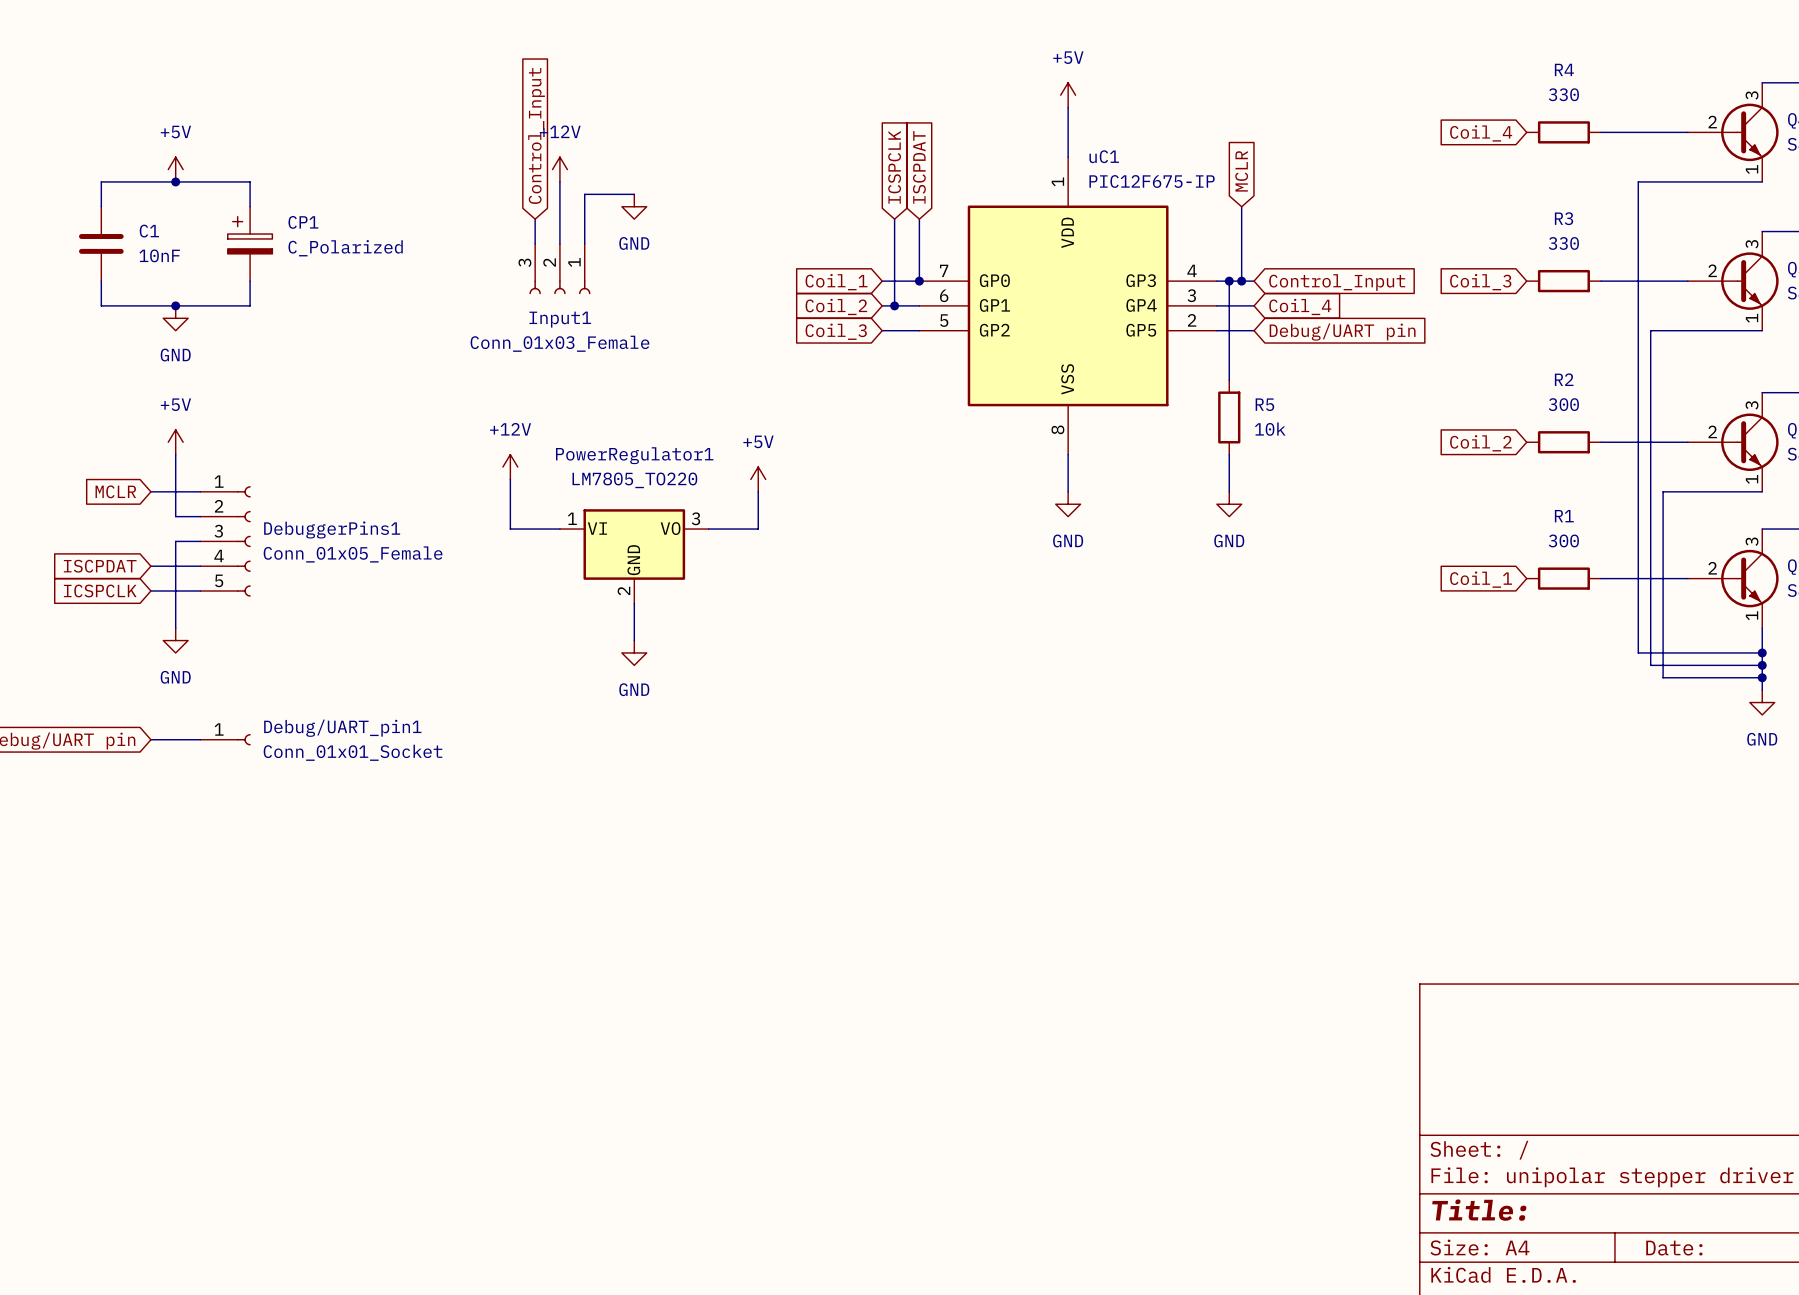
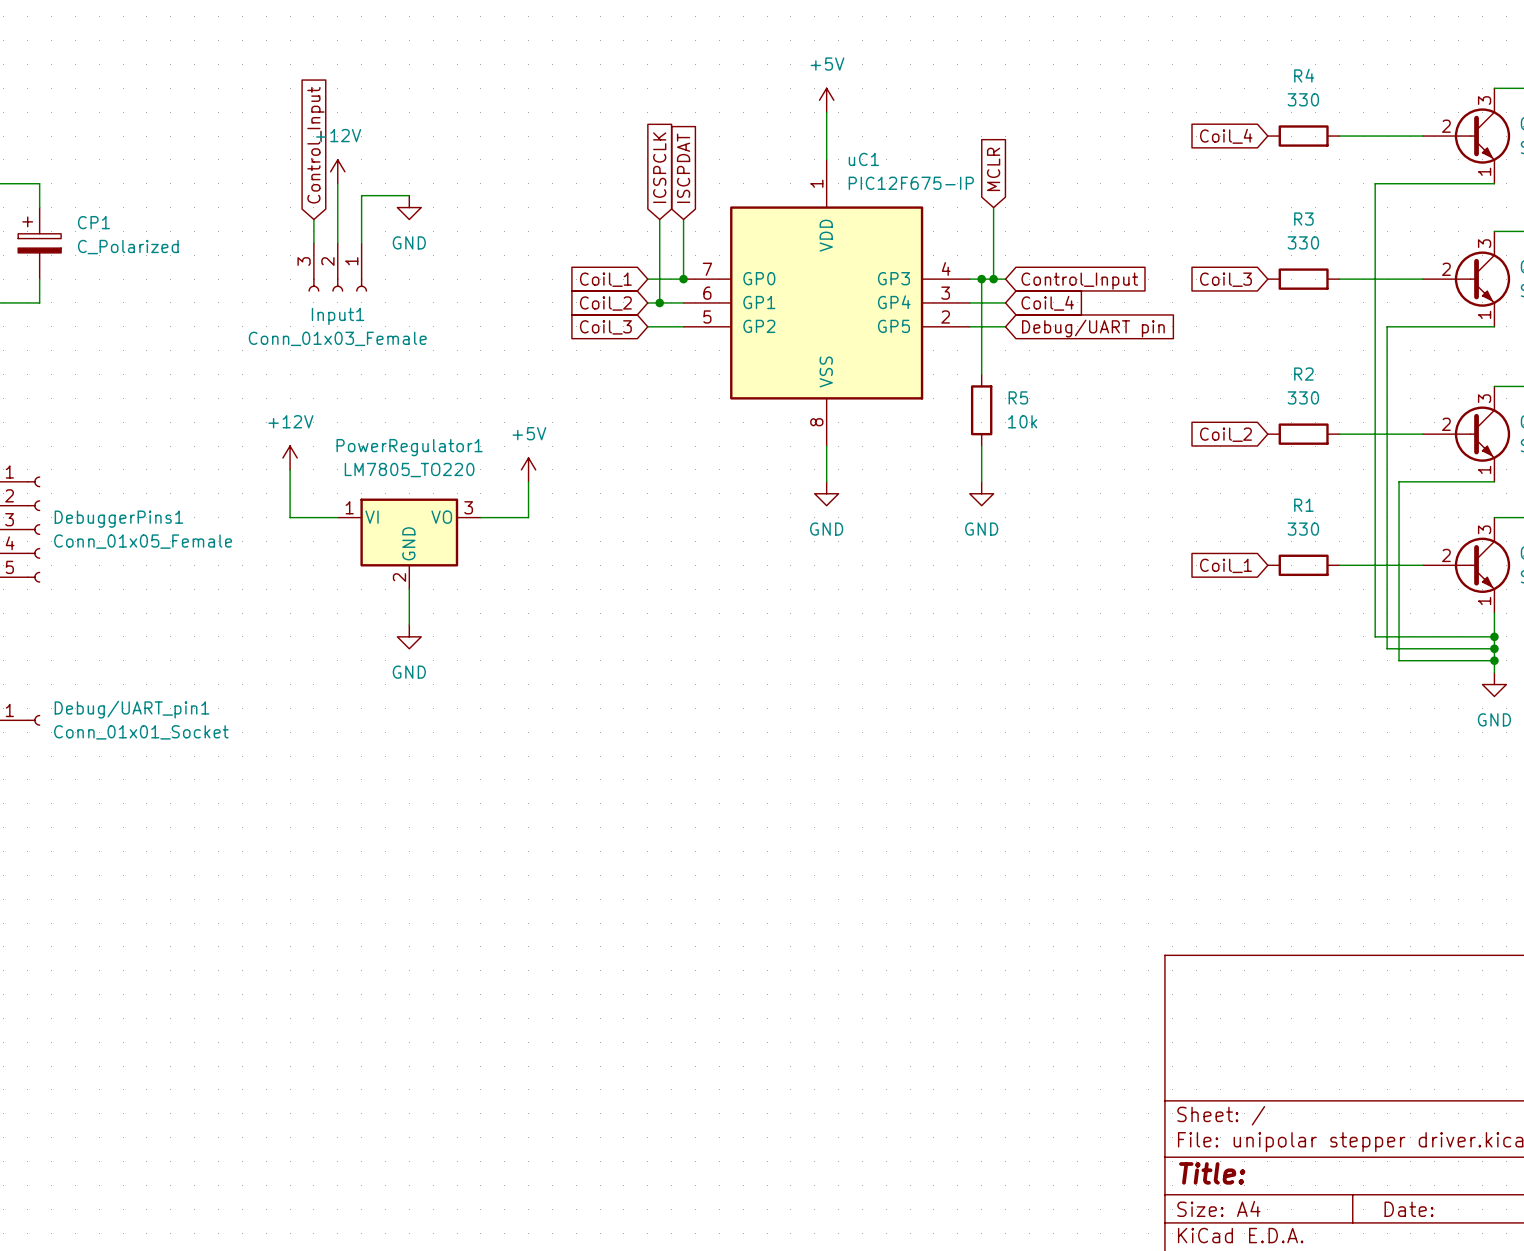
R2 value: 300 (1563, 404) -> 330 (1303, 397)
R1 value: 300 (1563, 540) -> 330 (1303, 529)

